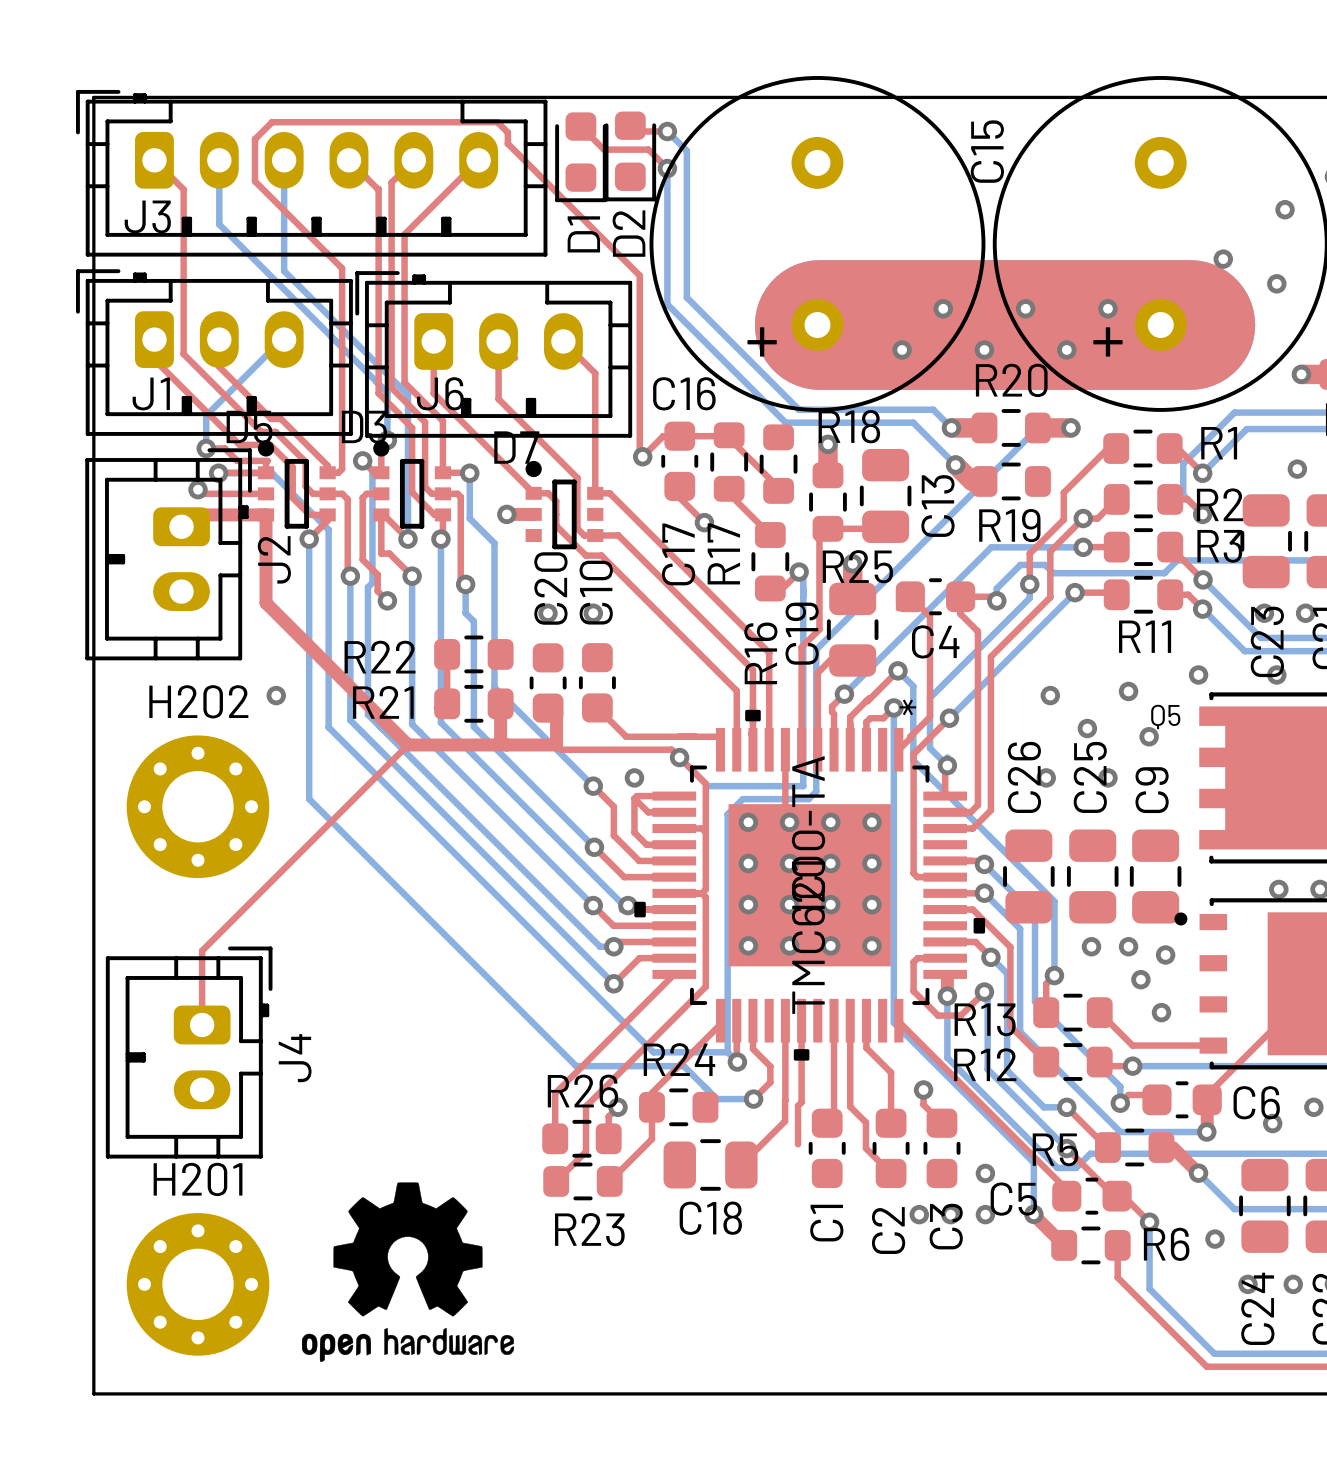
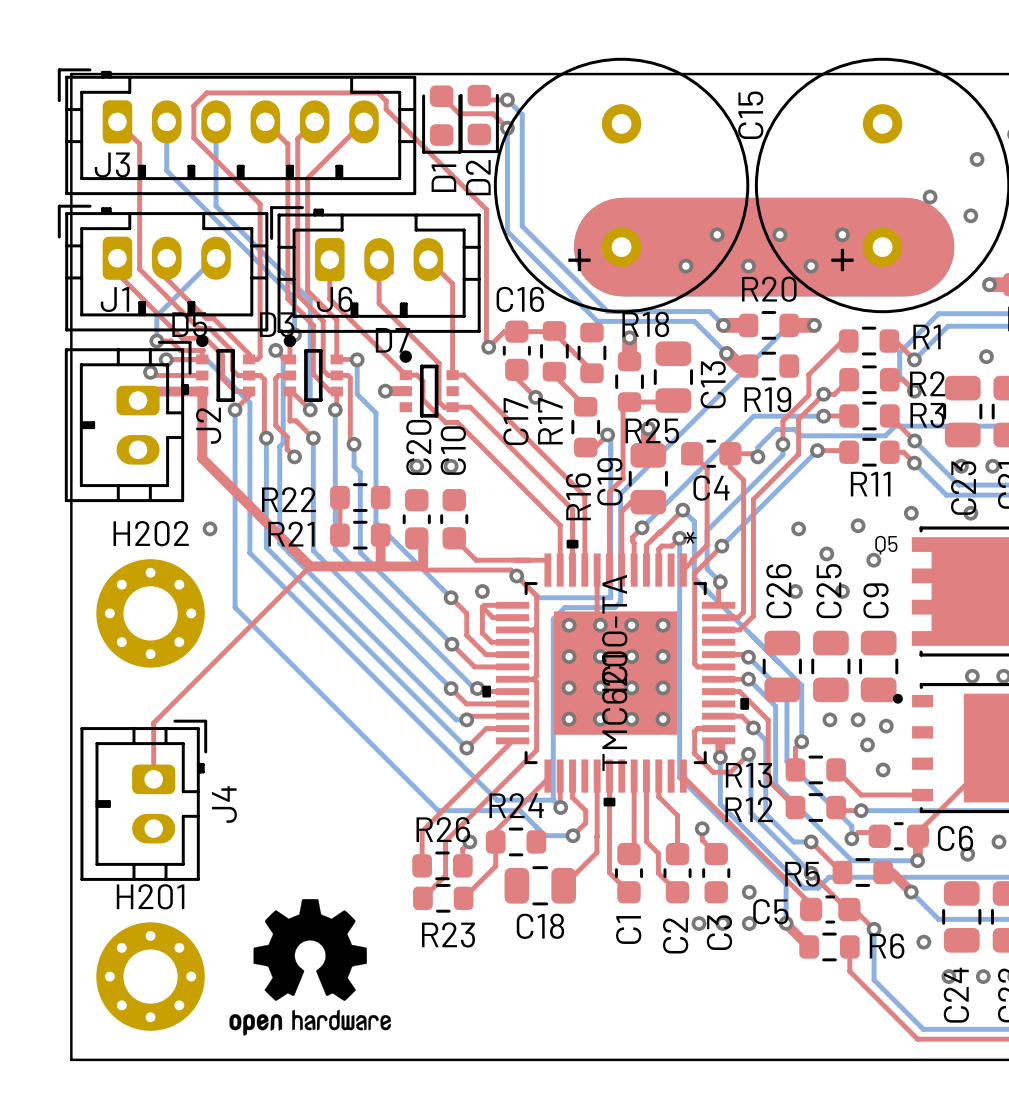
top track: (801, 1102) (798, 1105) (798, 1144) -> (609, 838) (609, 872) (628, 892)

